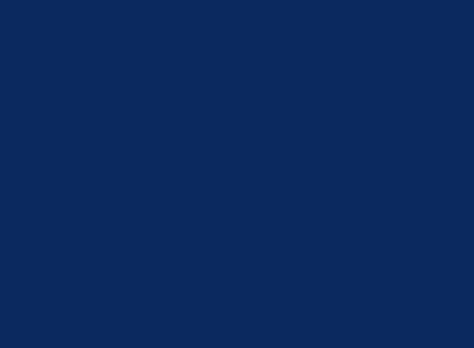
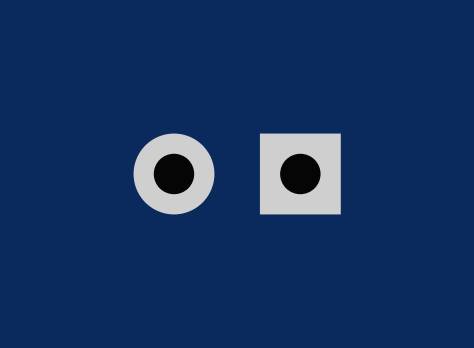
part: none -> (237, 173)

